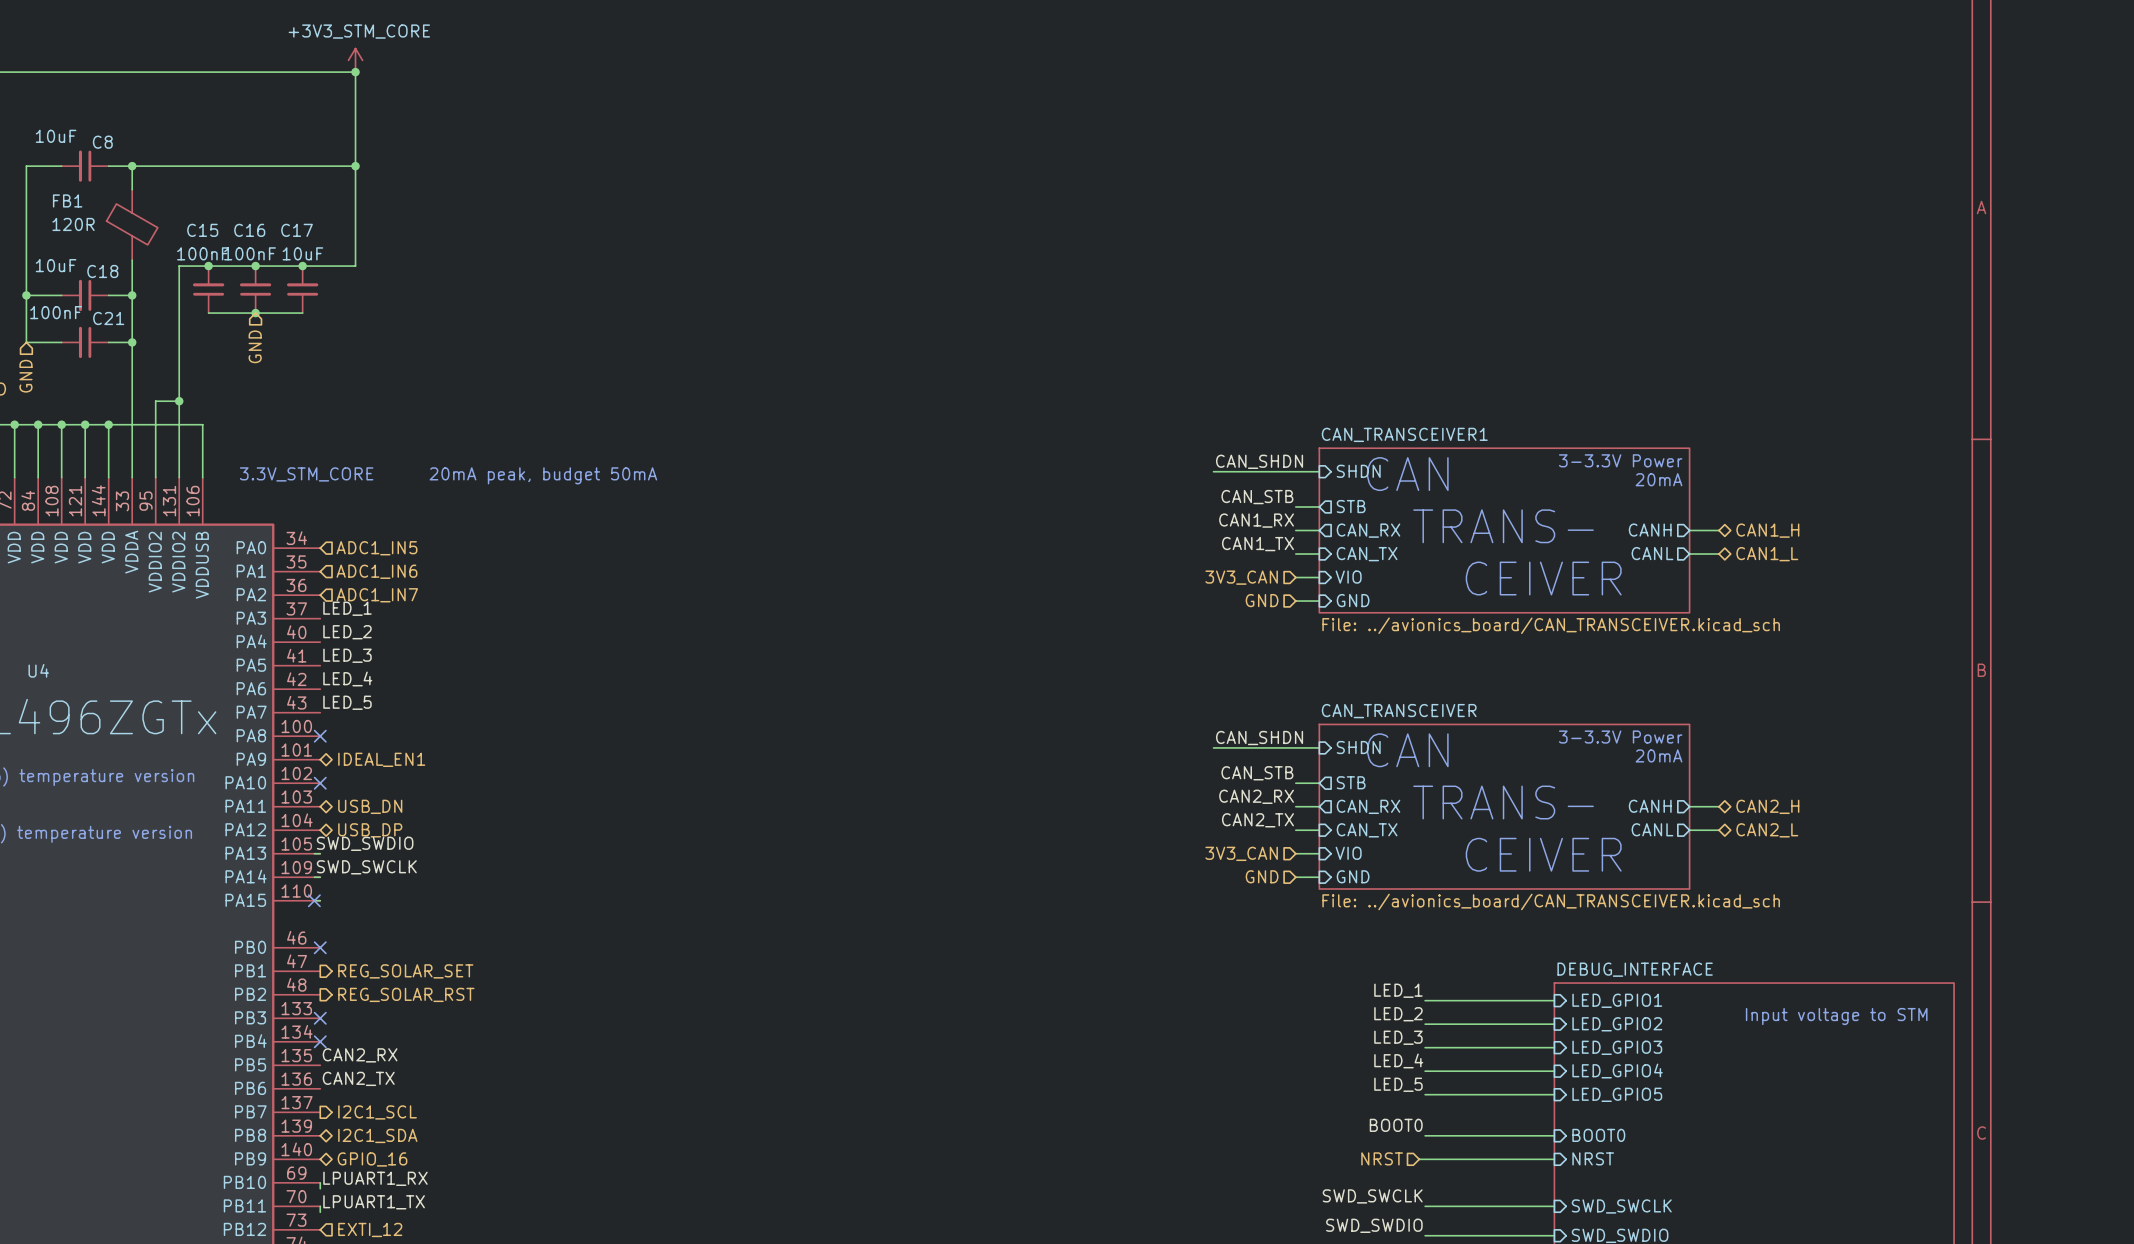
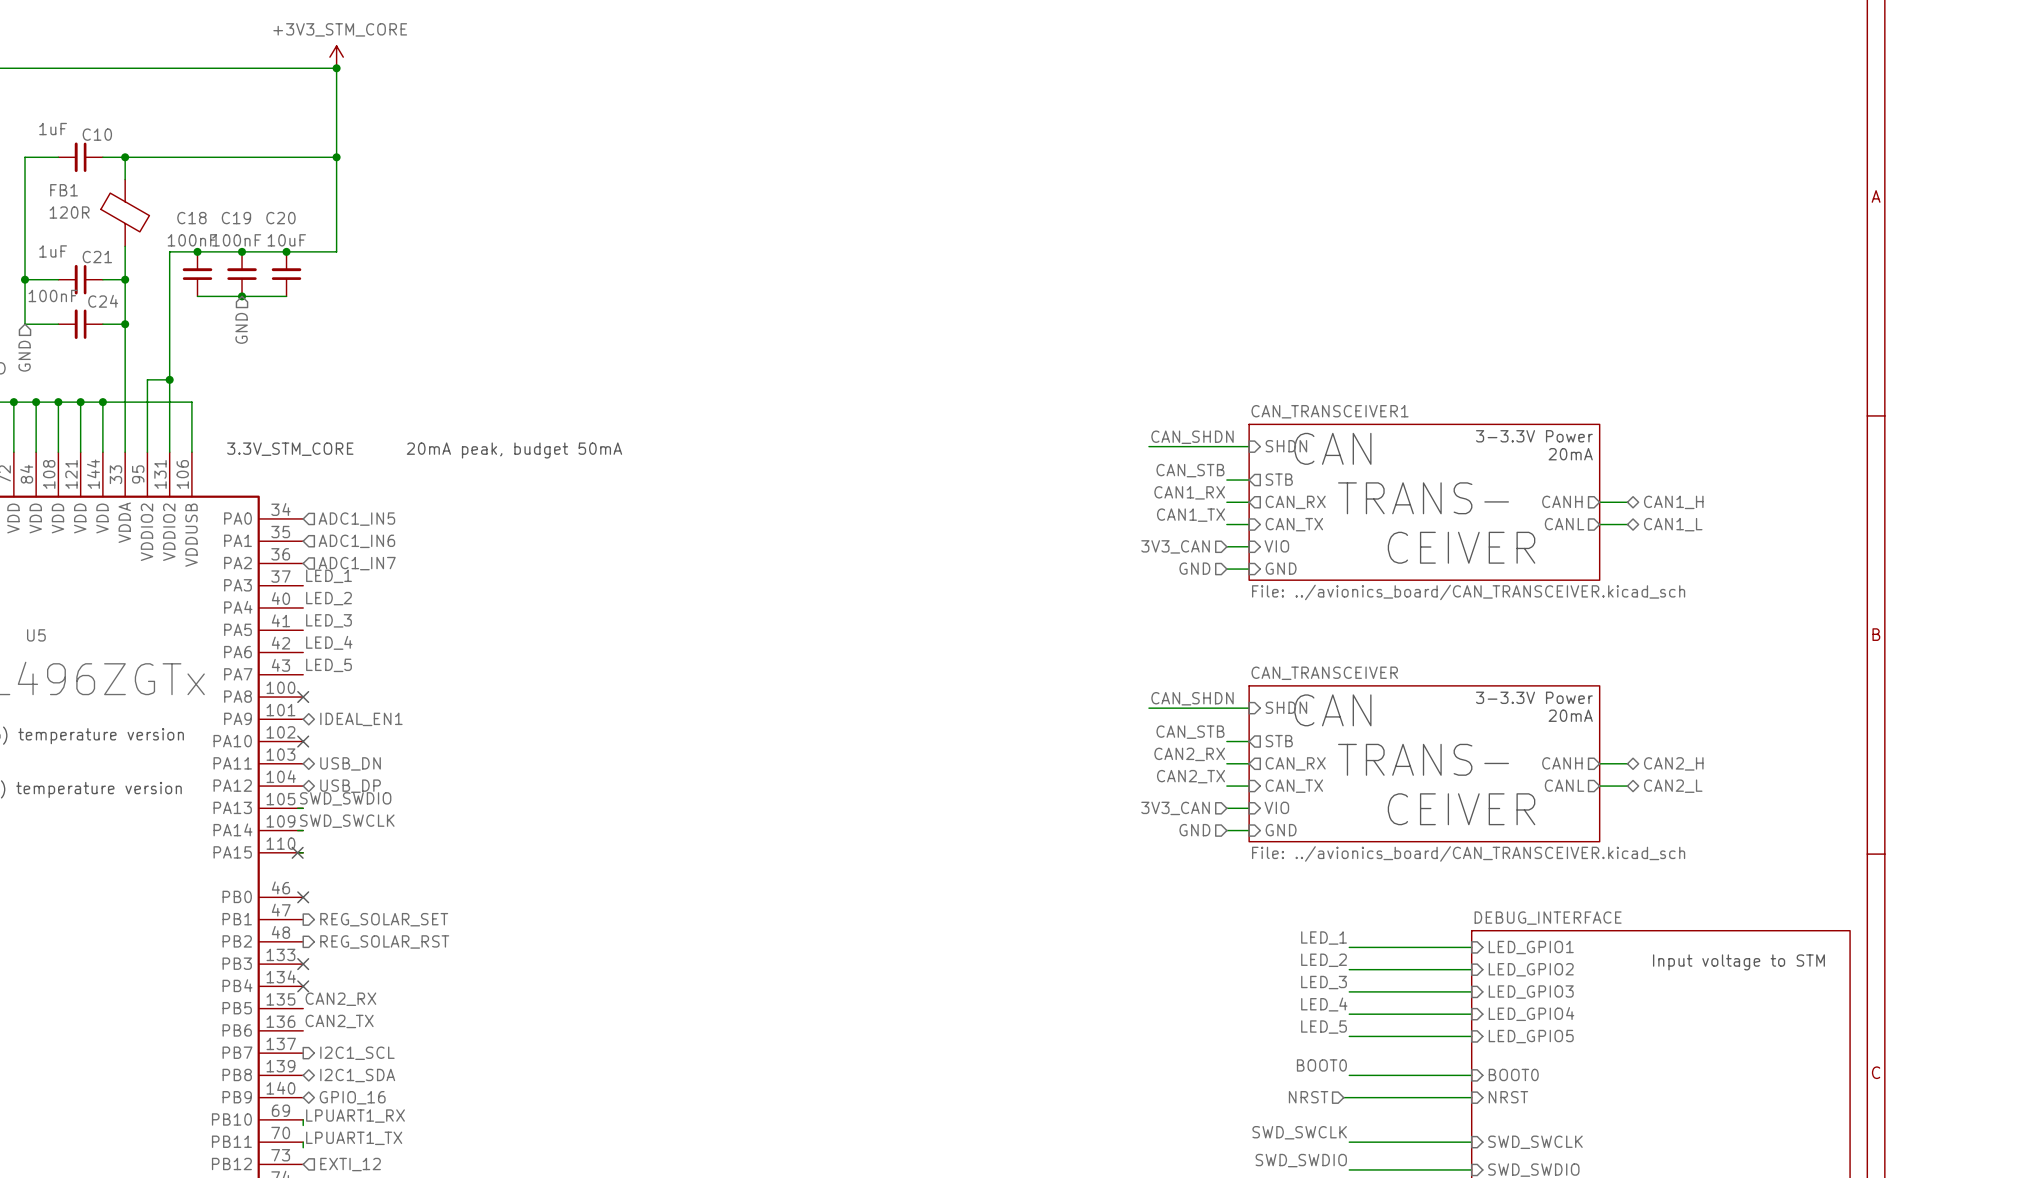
C8 value: 10uF (56, 136) -> 1uF (53, 129)
C8 name: C8 (102, 142) -> C10 (97, 134)
C15 name: C15 (202, 230) -> C18 (191, 218)
C16 name: C16 (249, 230) -> C19 (236, 218)
C17 name: C17 (297, 230) -> C20 (280, 218)
C18 value: 10uF (56, 265) -> 1uF (53, 251)
C18 name: C18 (102, 271) -> C21 (97, 257)
C21 name: C21 (108, 318) -> C24 (103, 301)
U4 name: U4 (38, 670) -> U5 (36, 635)

